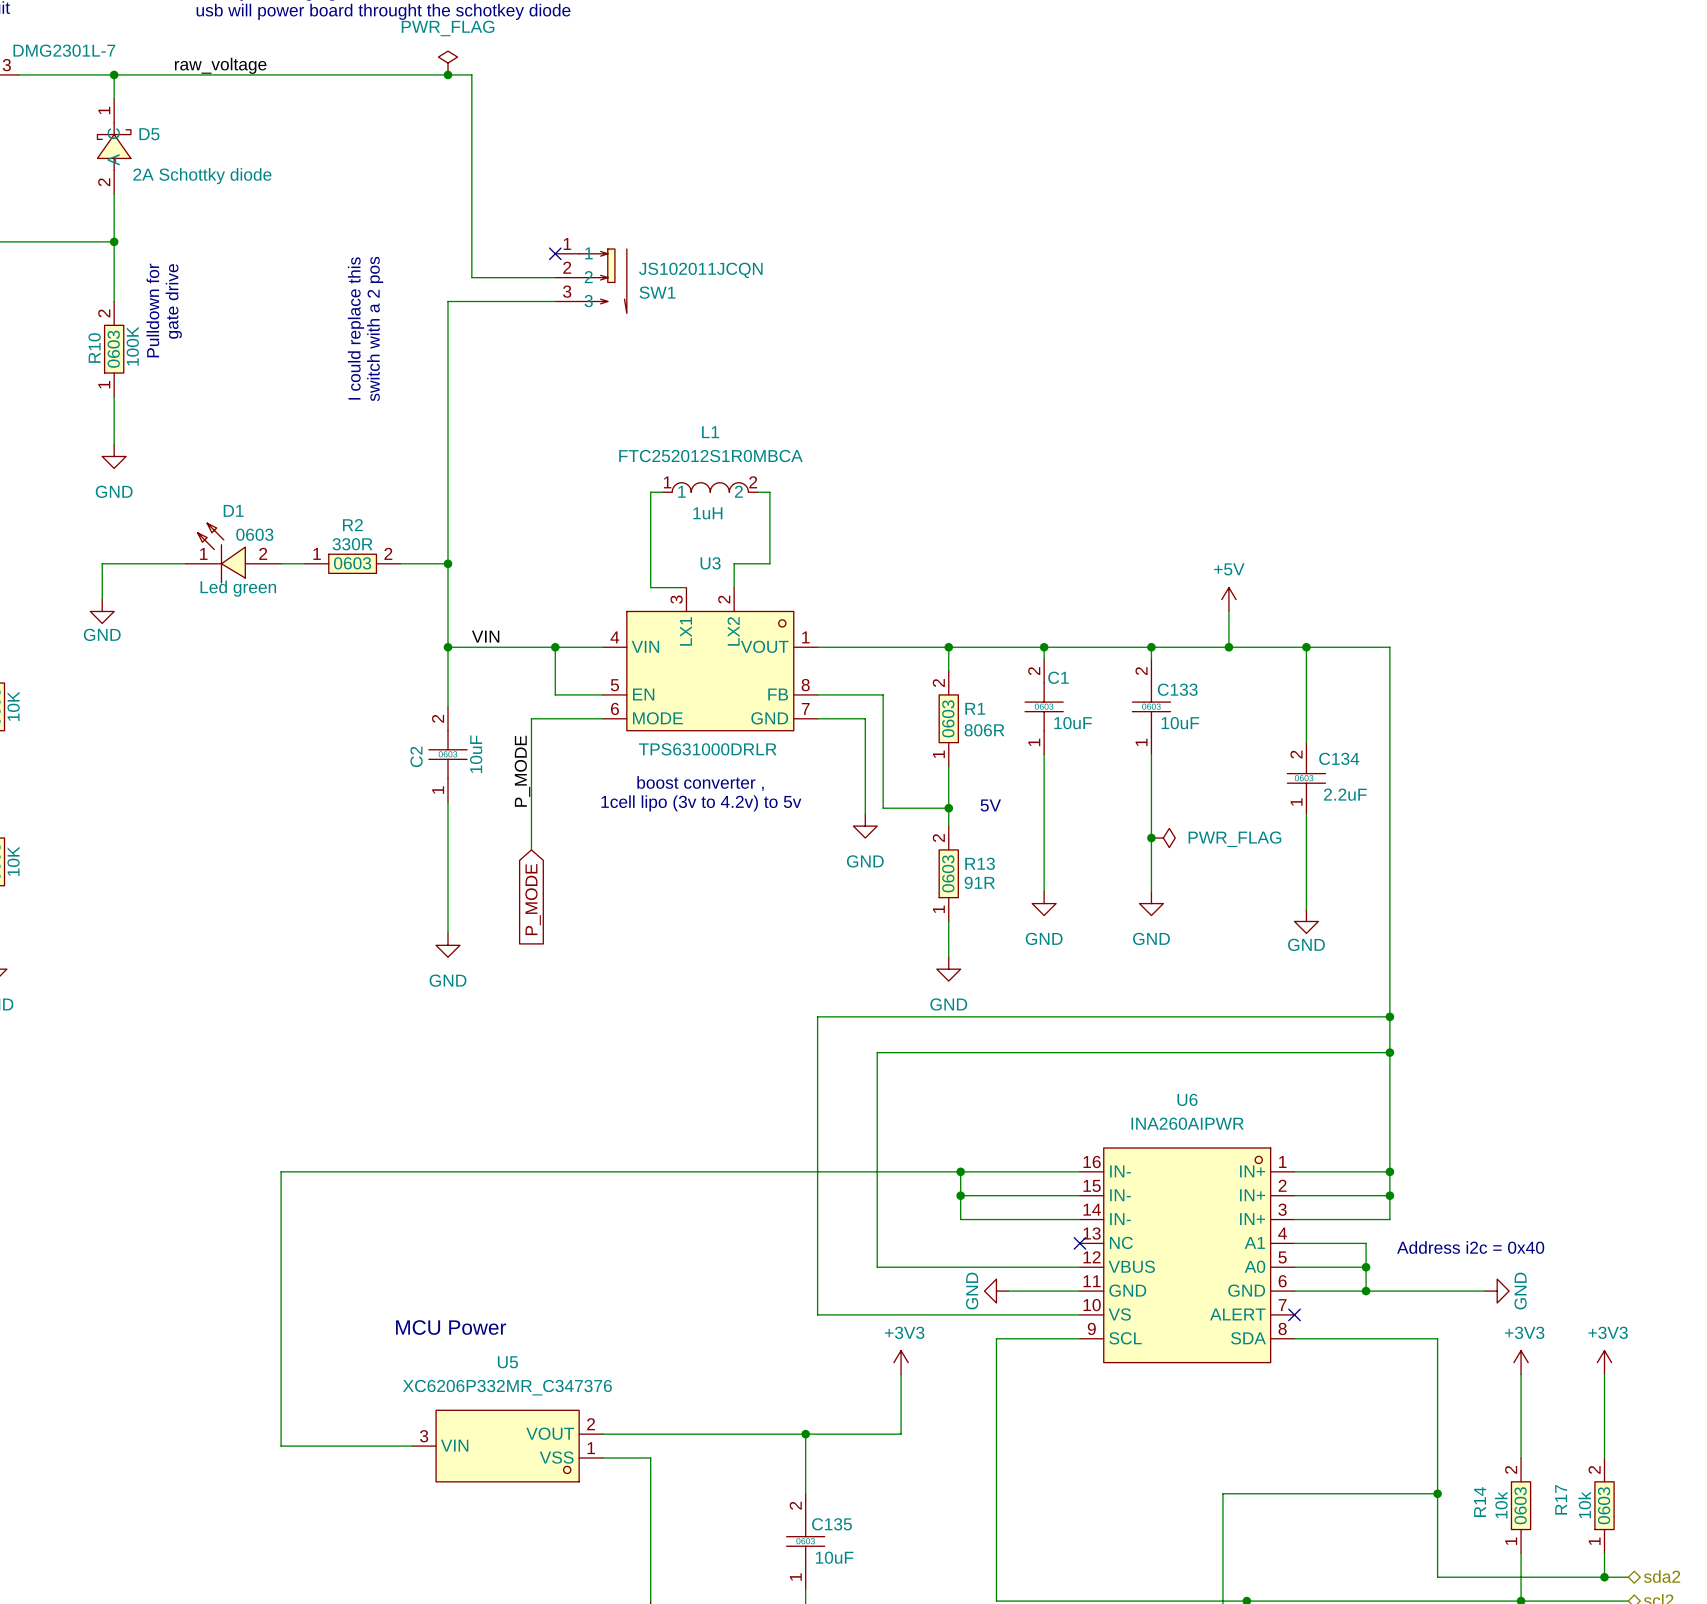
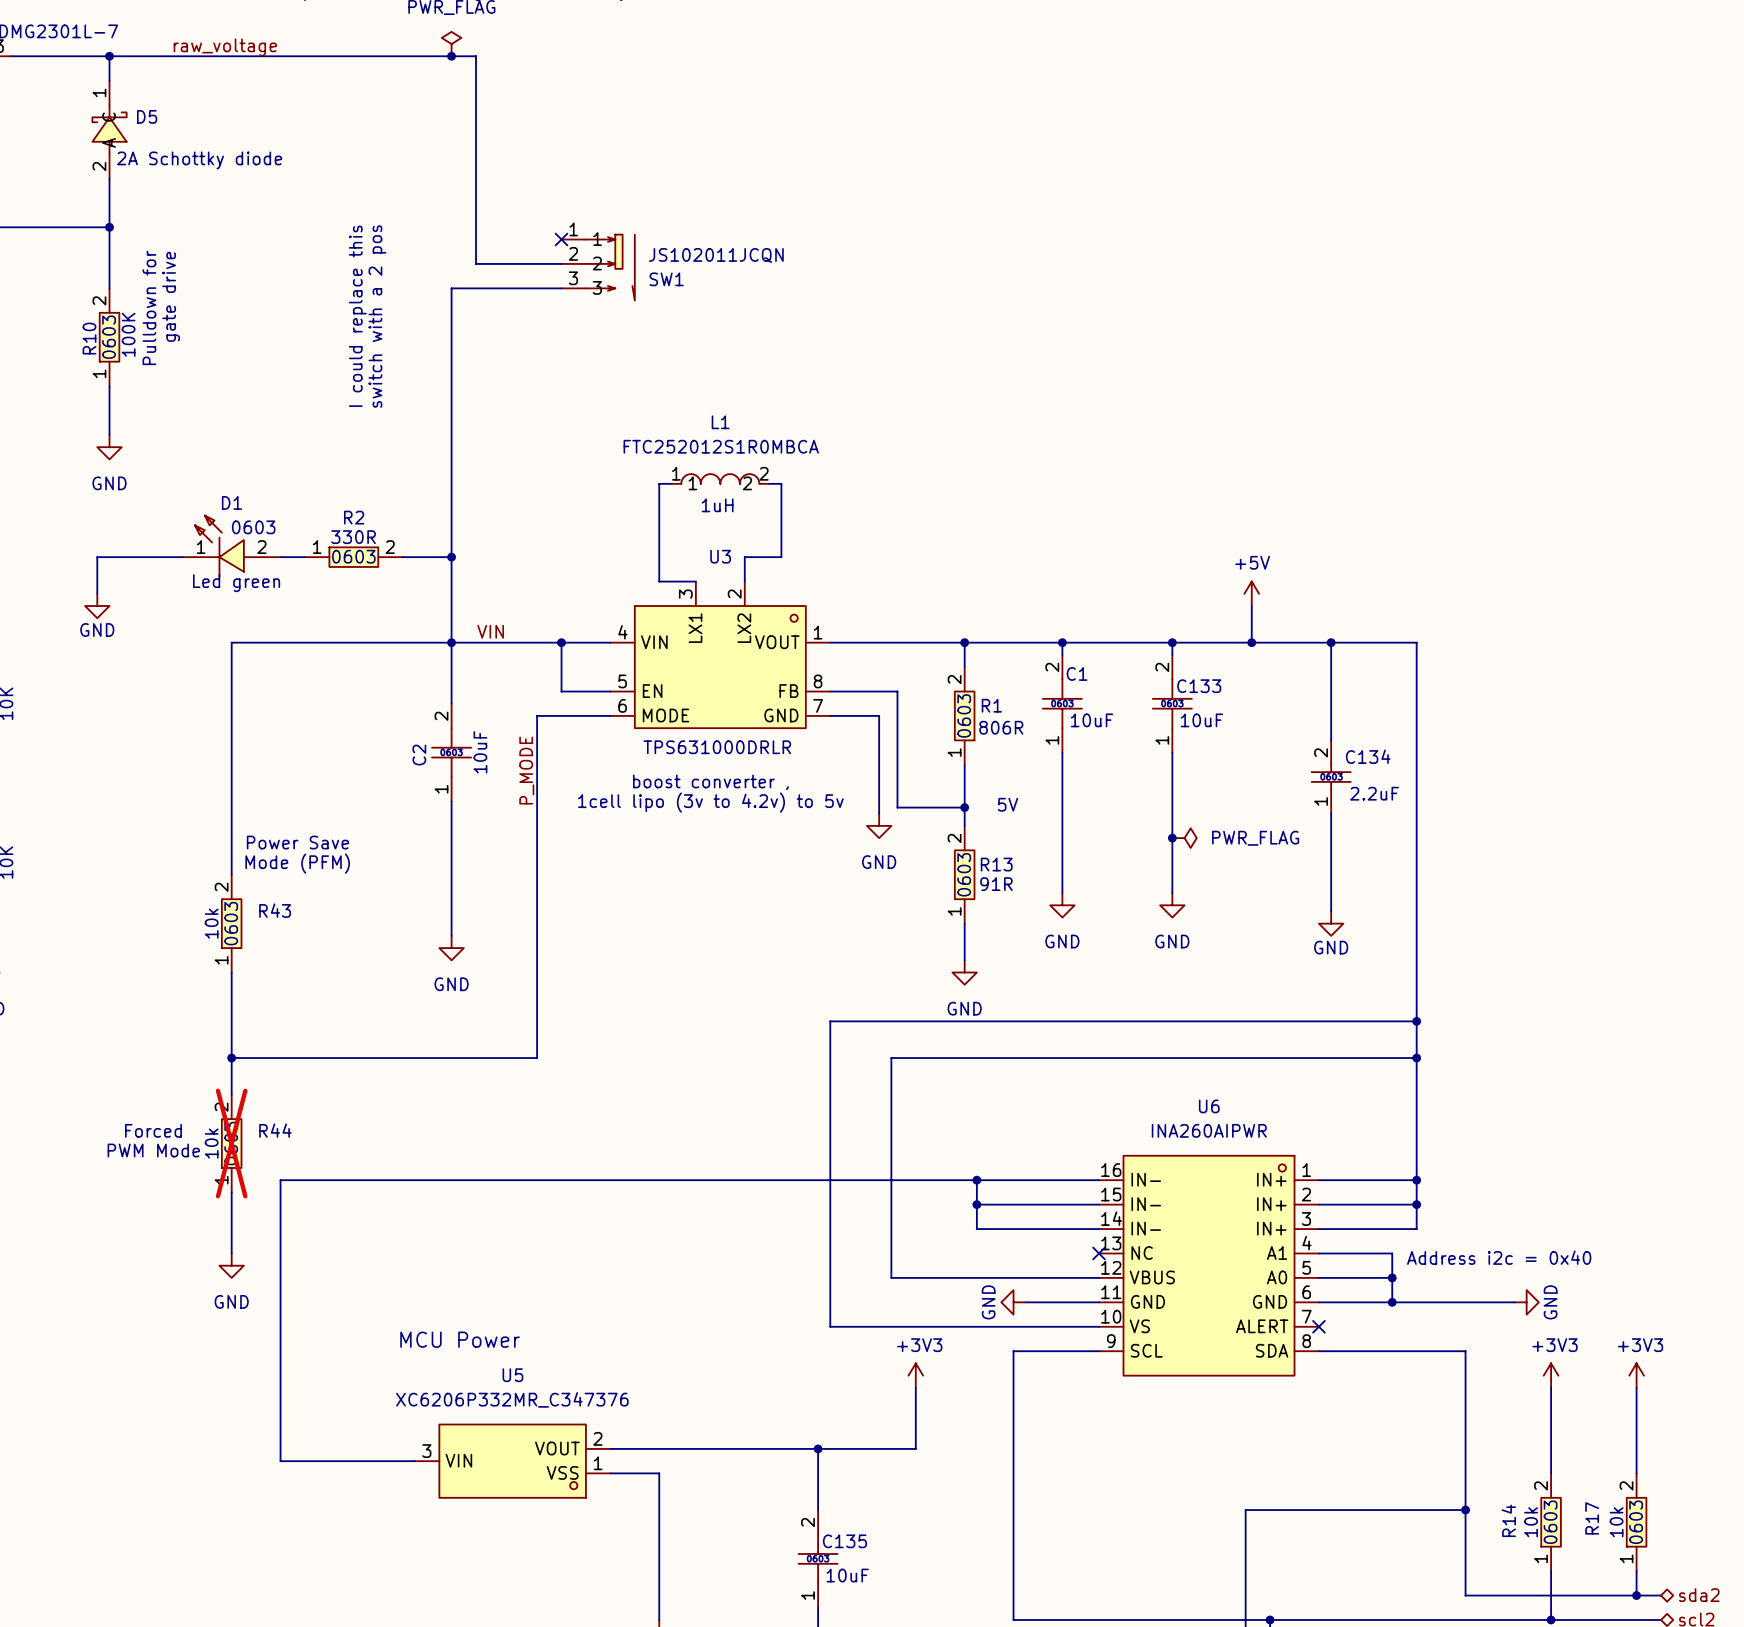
wire: none -> (451, 642) (231, 642) (231, 874)
text: none -> Power Save (297, 842)
wire: none -> (537, 850) (537, 1058) (231, 1058)
text: none -> Mode (PFM) (297, 863)
global label: P_MODE (533, 899) -> none
R43: none -> (231, 923)
wire: none -> (231, 972) (231, 1094)
junction: none -> (231, 1058)
text: none -> Forced (153, 1130)
R44: none -> (231, 1143)
text: none -> PWM Mode (153, 1150)
wire: none -> (231, 1192) (231, 1253)
power symbol: none -> GND (231, 1265)

